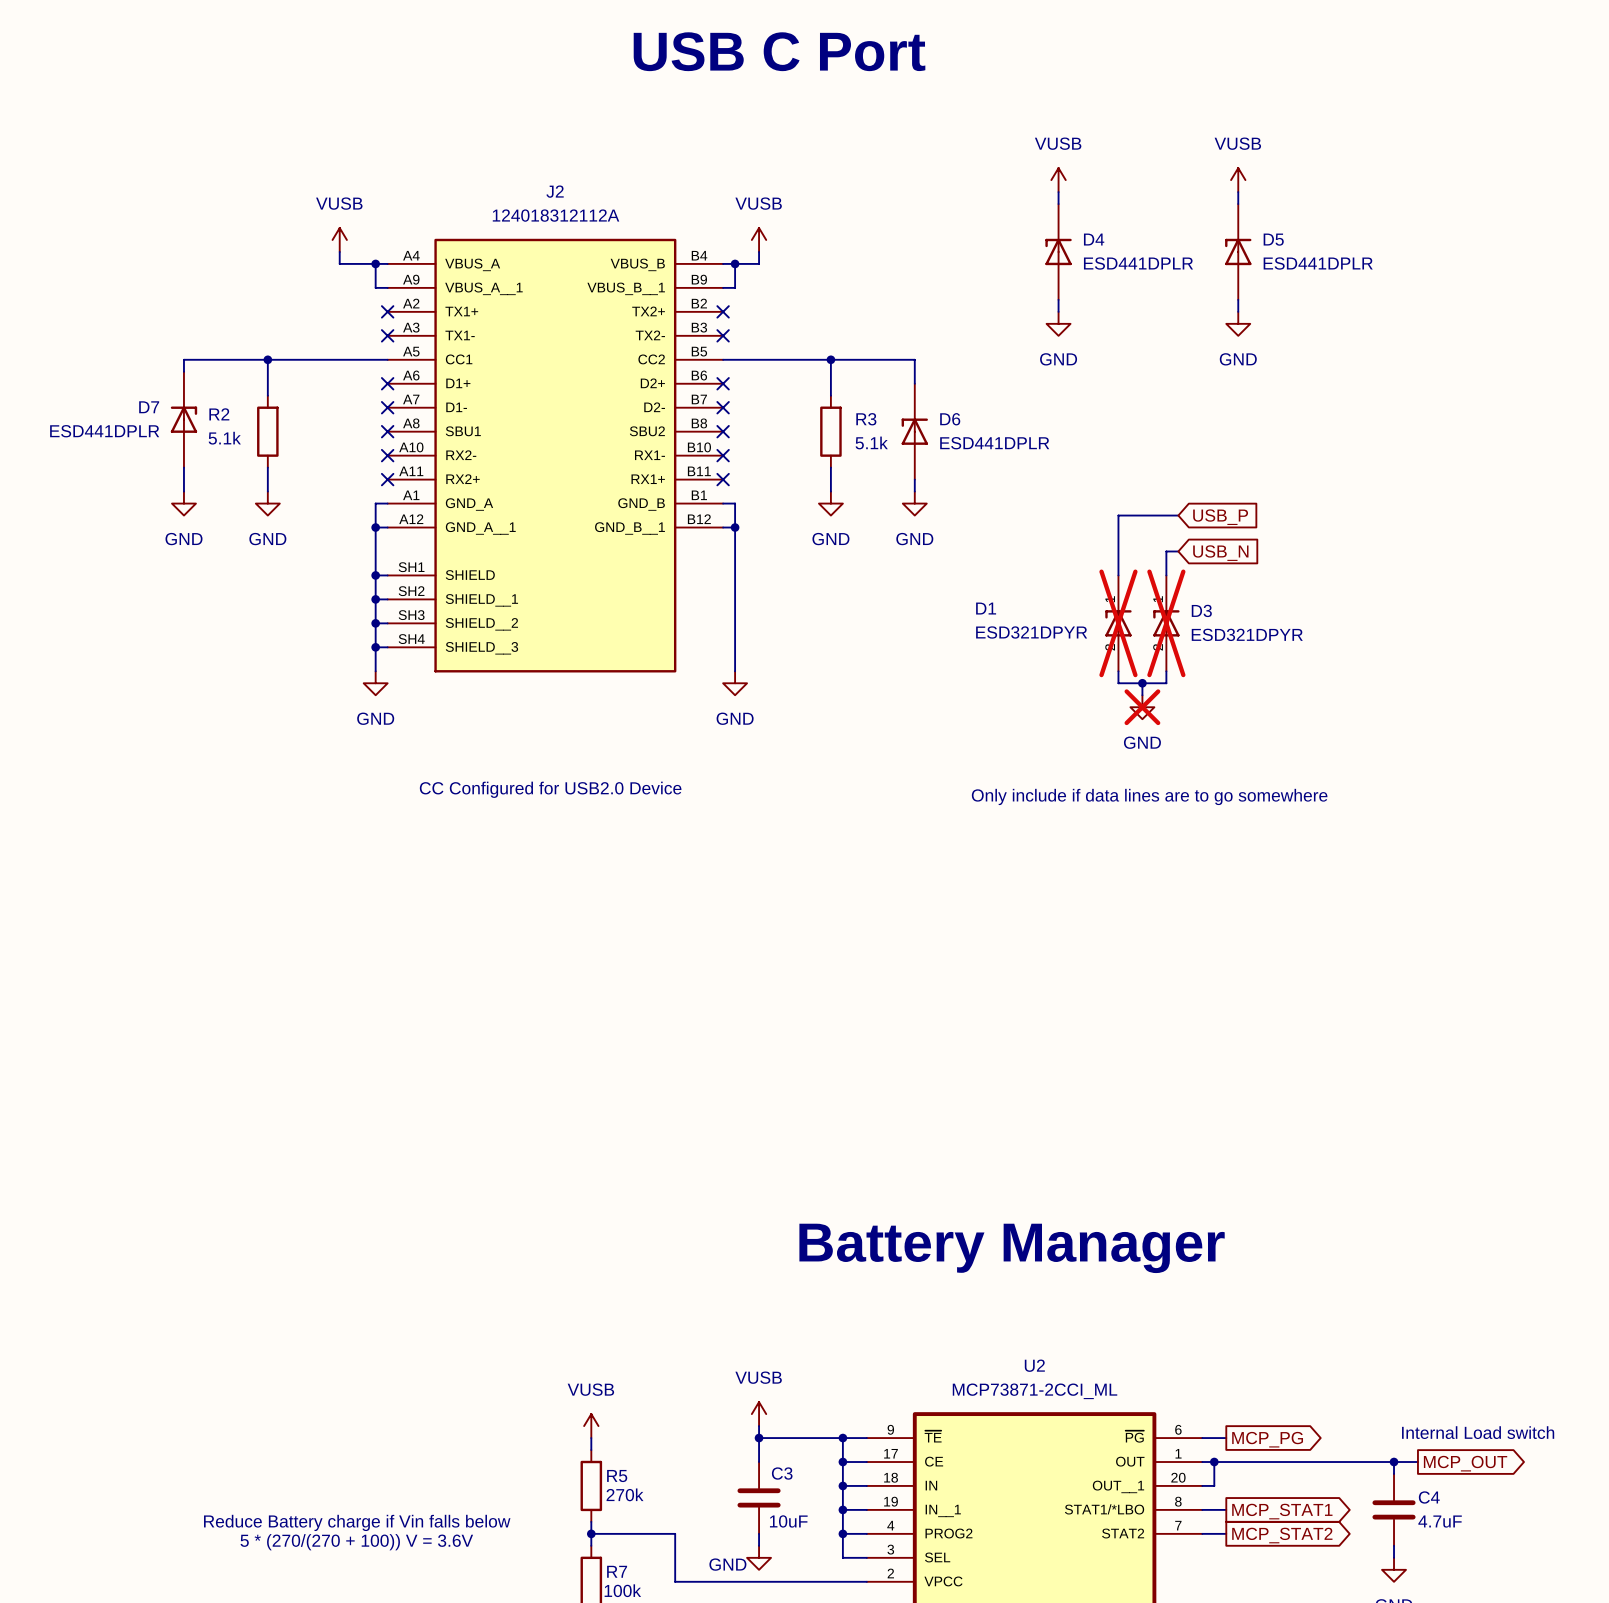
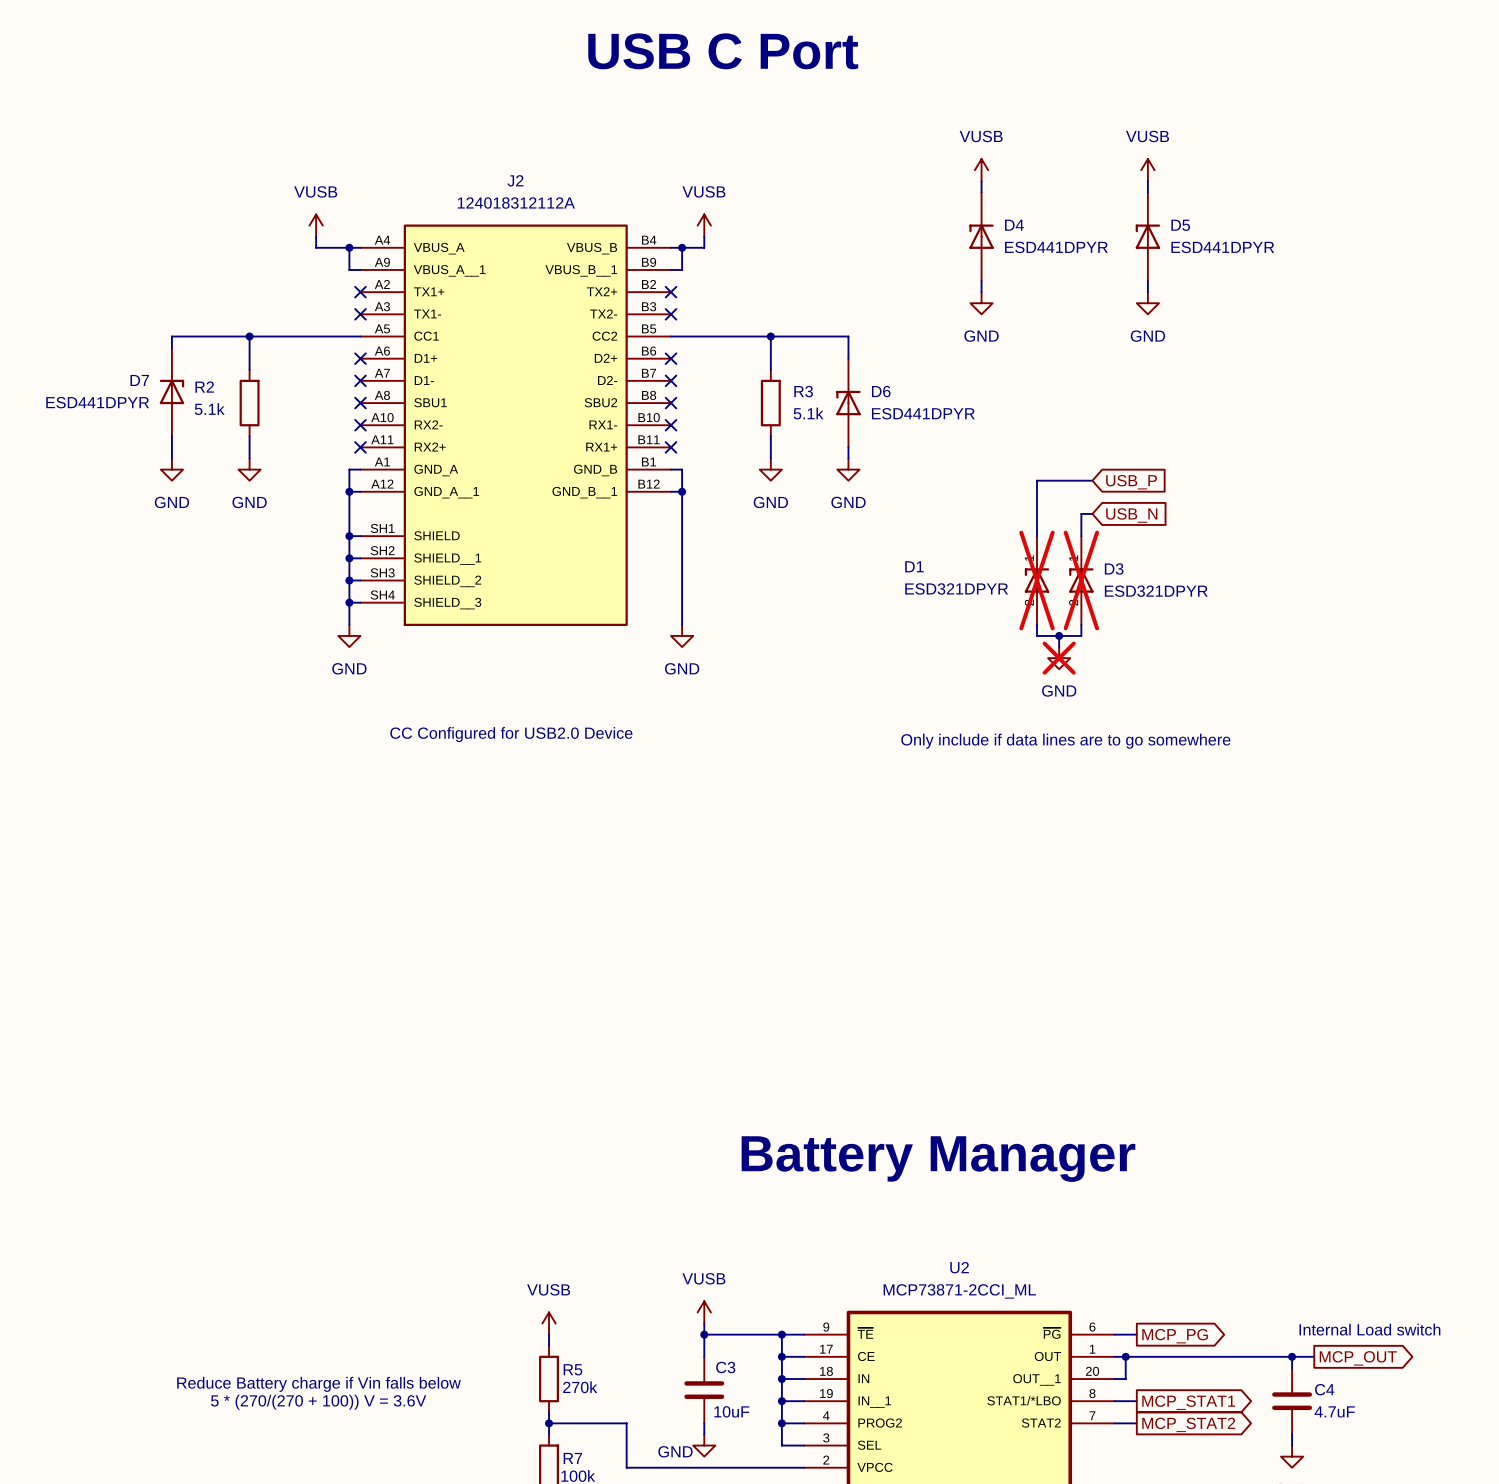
D4 value: ESD441DPLR (1138, 263) -> ESD441DPYR (1056, 247)
D5 value: ESD441DPLR (1318, 263) -> ESD441DPYR (1222, 247)
D7 value: ESD441DPLR (104, 431) -> ESD441DPYR (97, 402)
D6 value: ESD441DPLR (994, 443) -> ESD441DPYR (923, 413)
text position: Reduce Battery charge if Vin falls below (357, 1522) -> Reduce Battery charge if Vin falls below (319, 1384)
text position: 5 * (270/(270 + 100)) V = 3.6V (356, 1542) -> 5 * (270/(270 + 100)) V = 3.6V (318, 1402)

